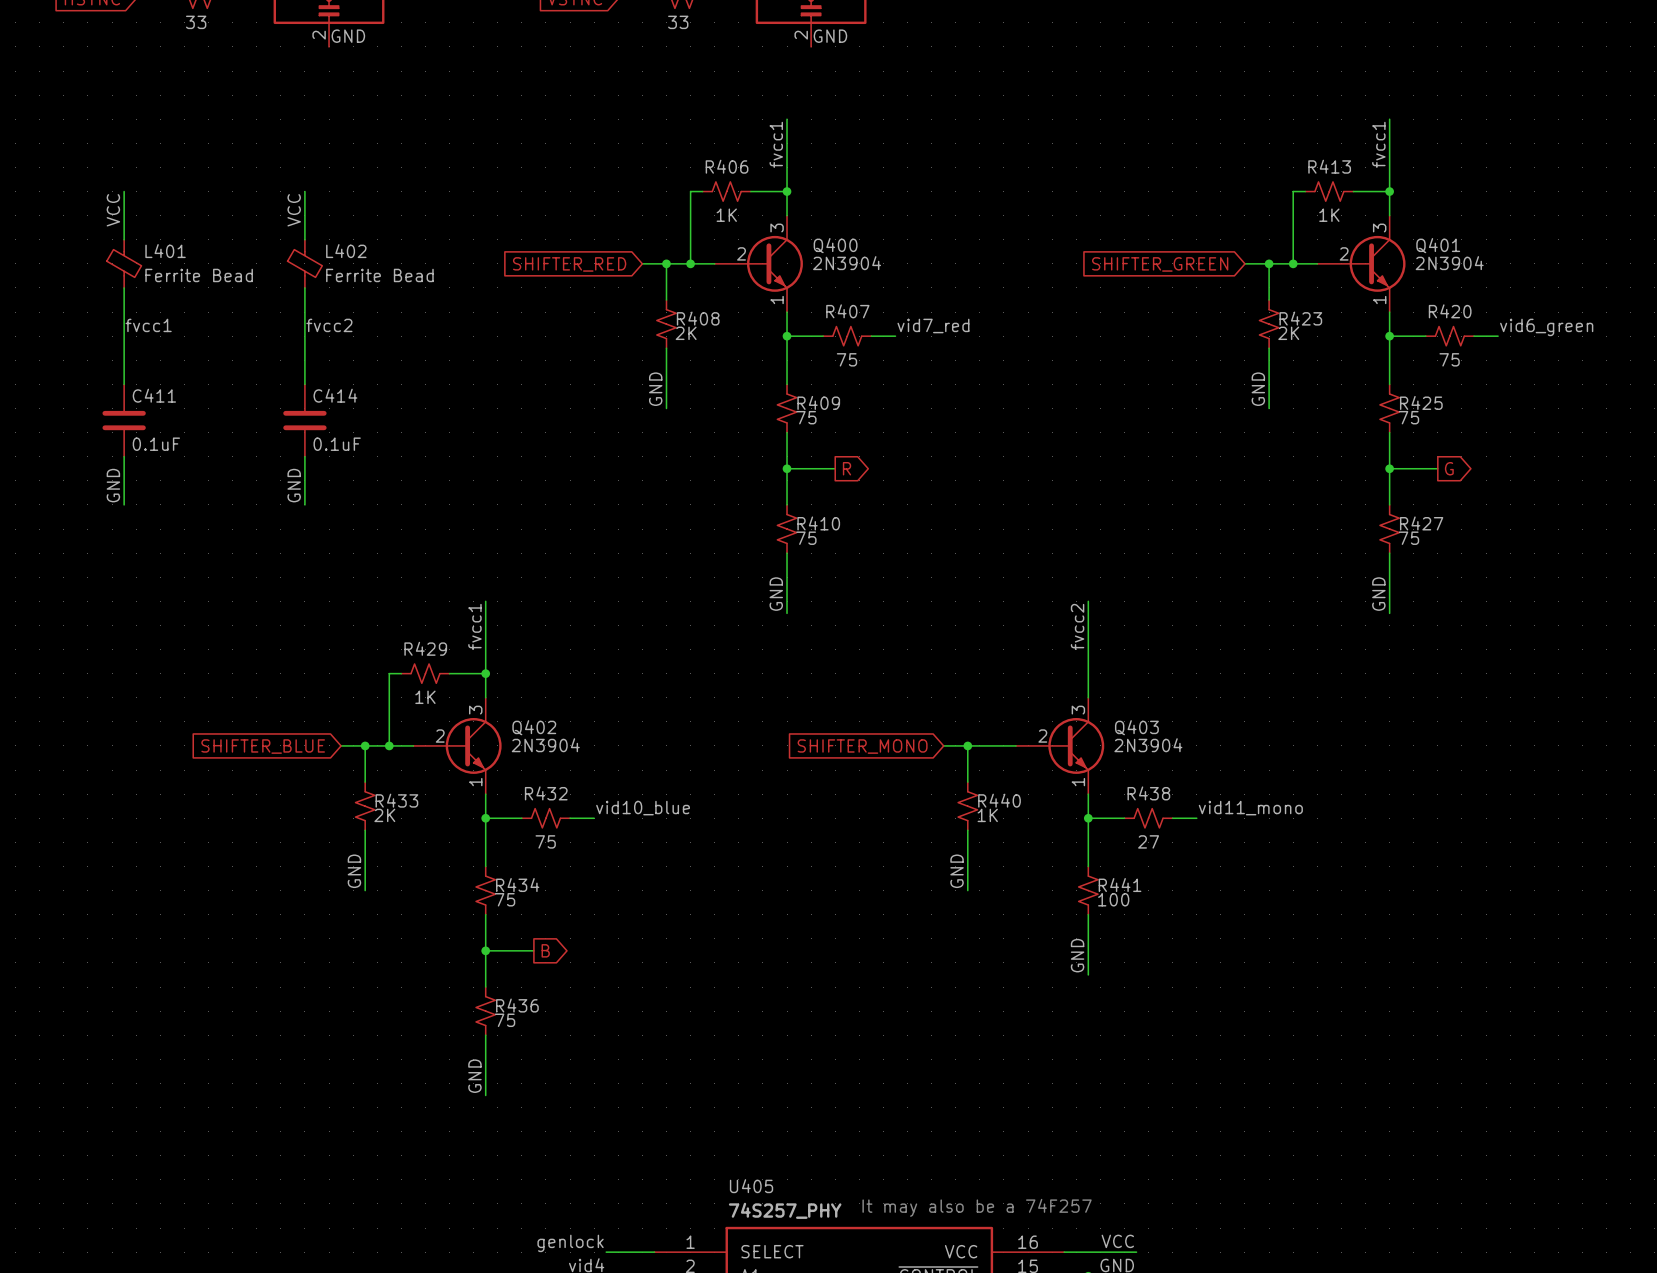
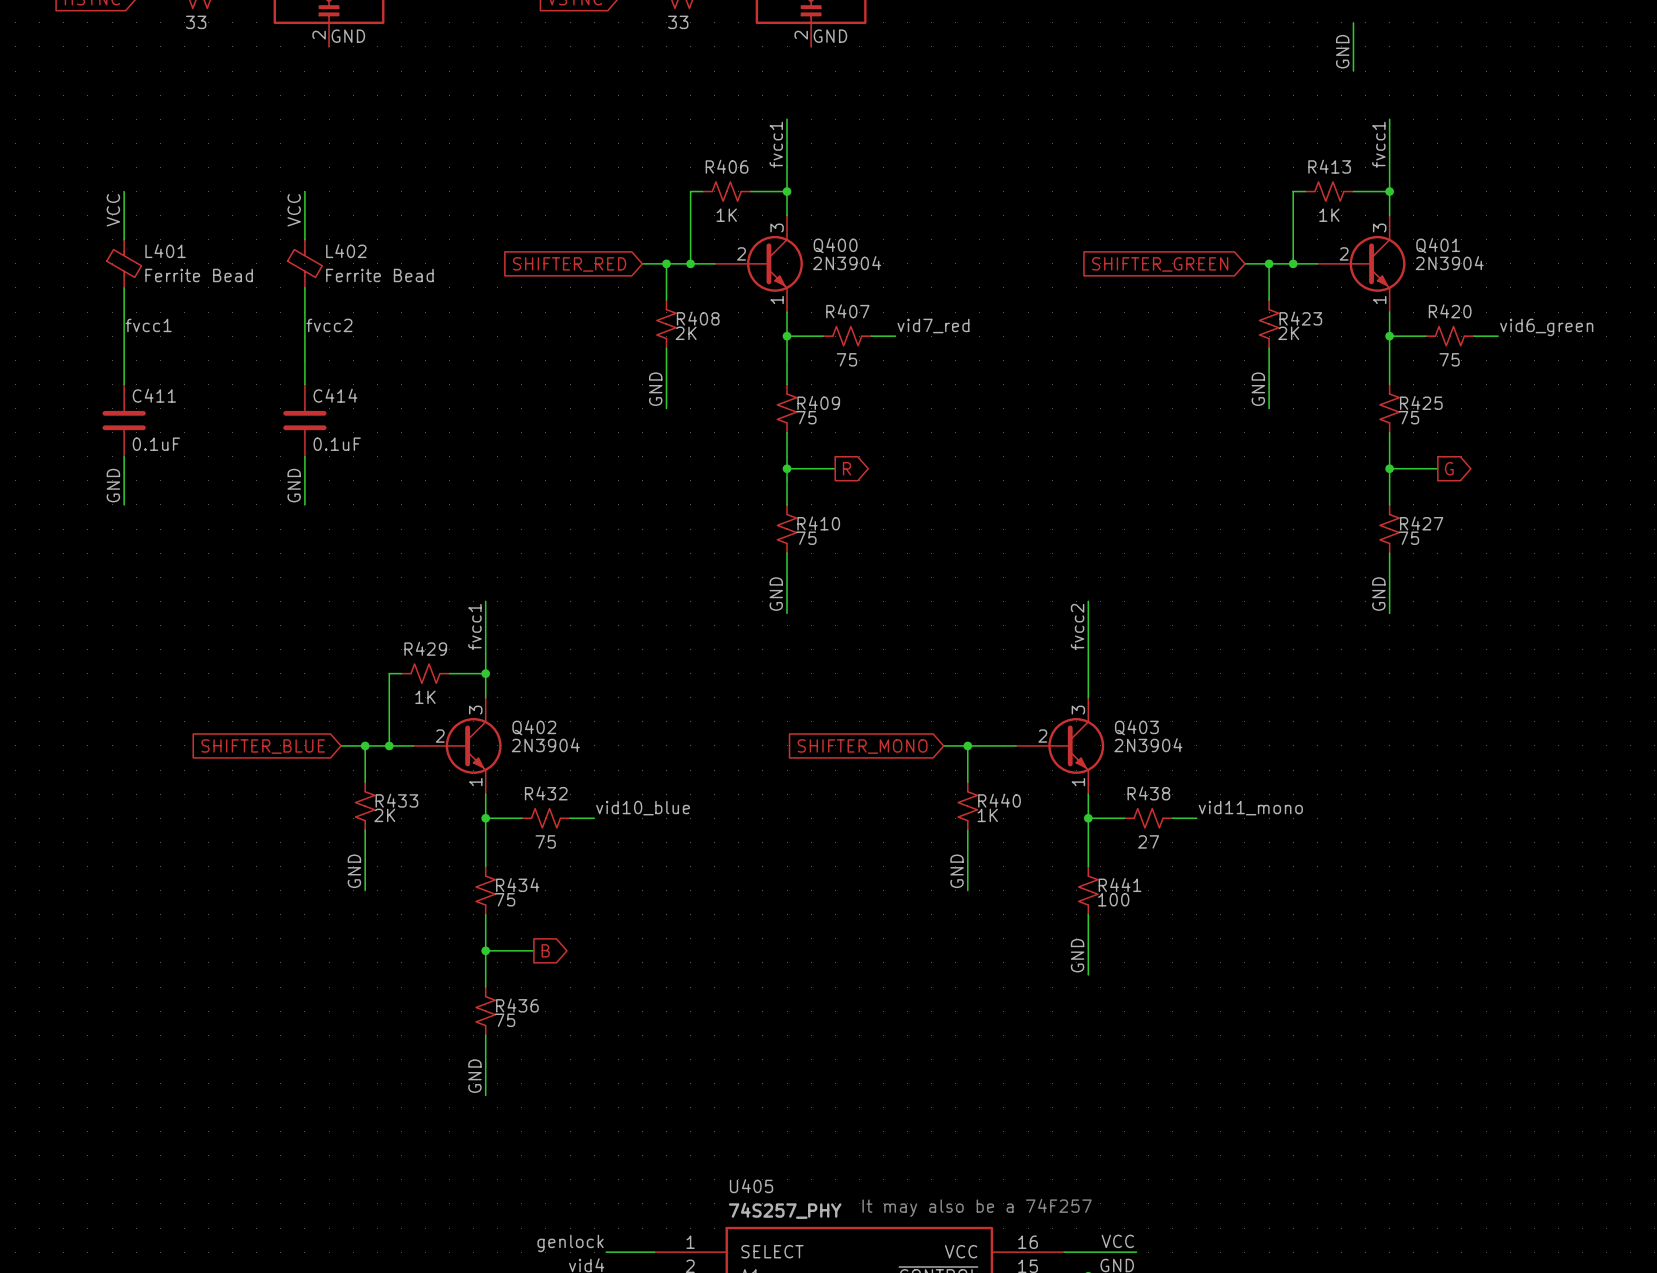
wire: none -> (1353, 22) (1353, 71)
label: none -> GND (1342, 51)

